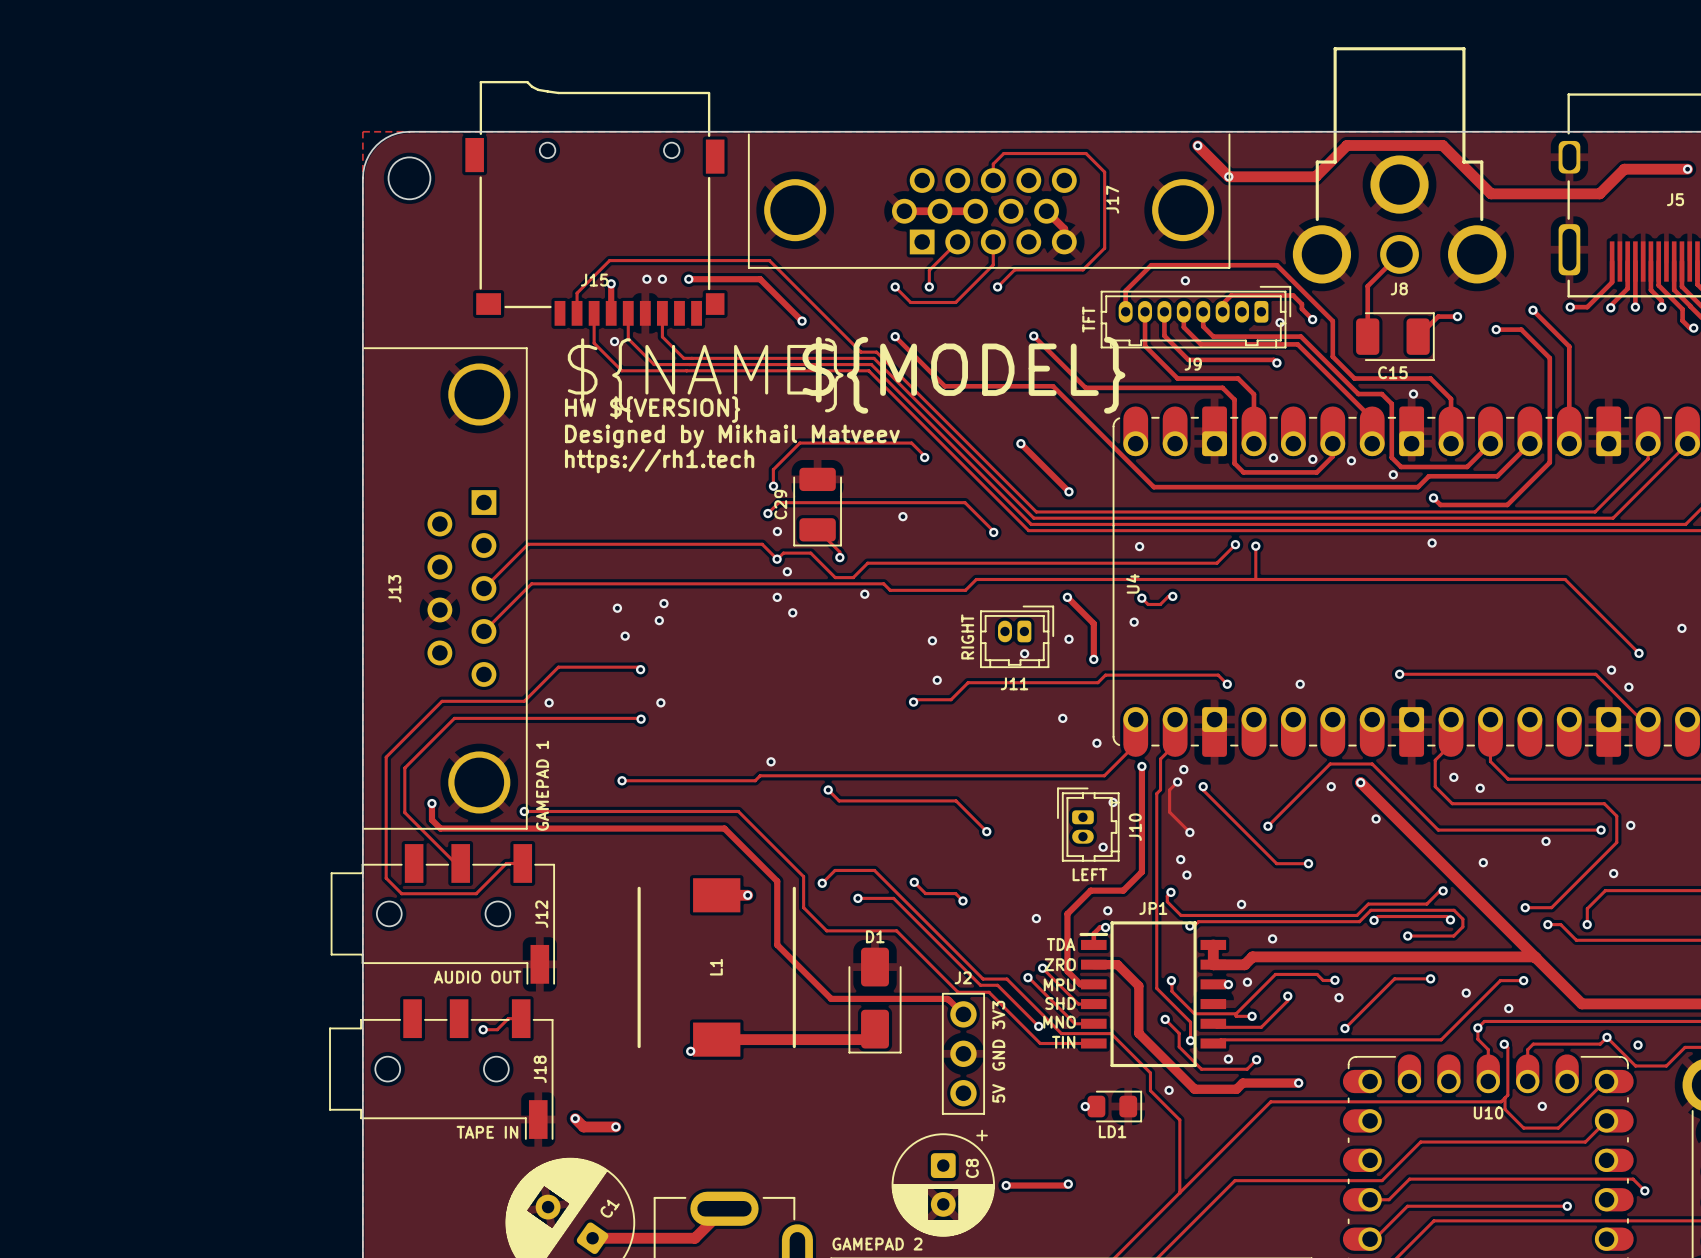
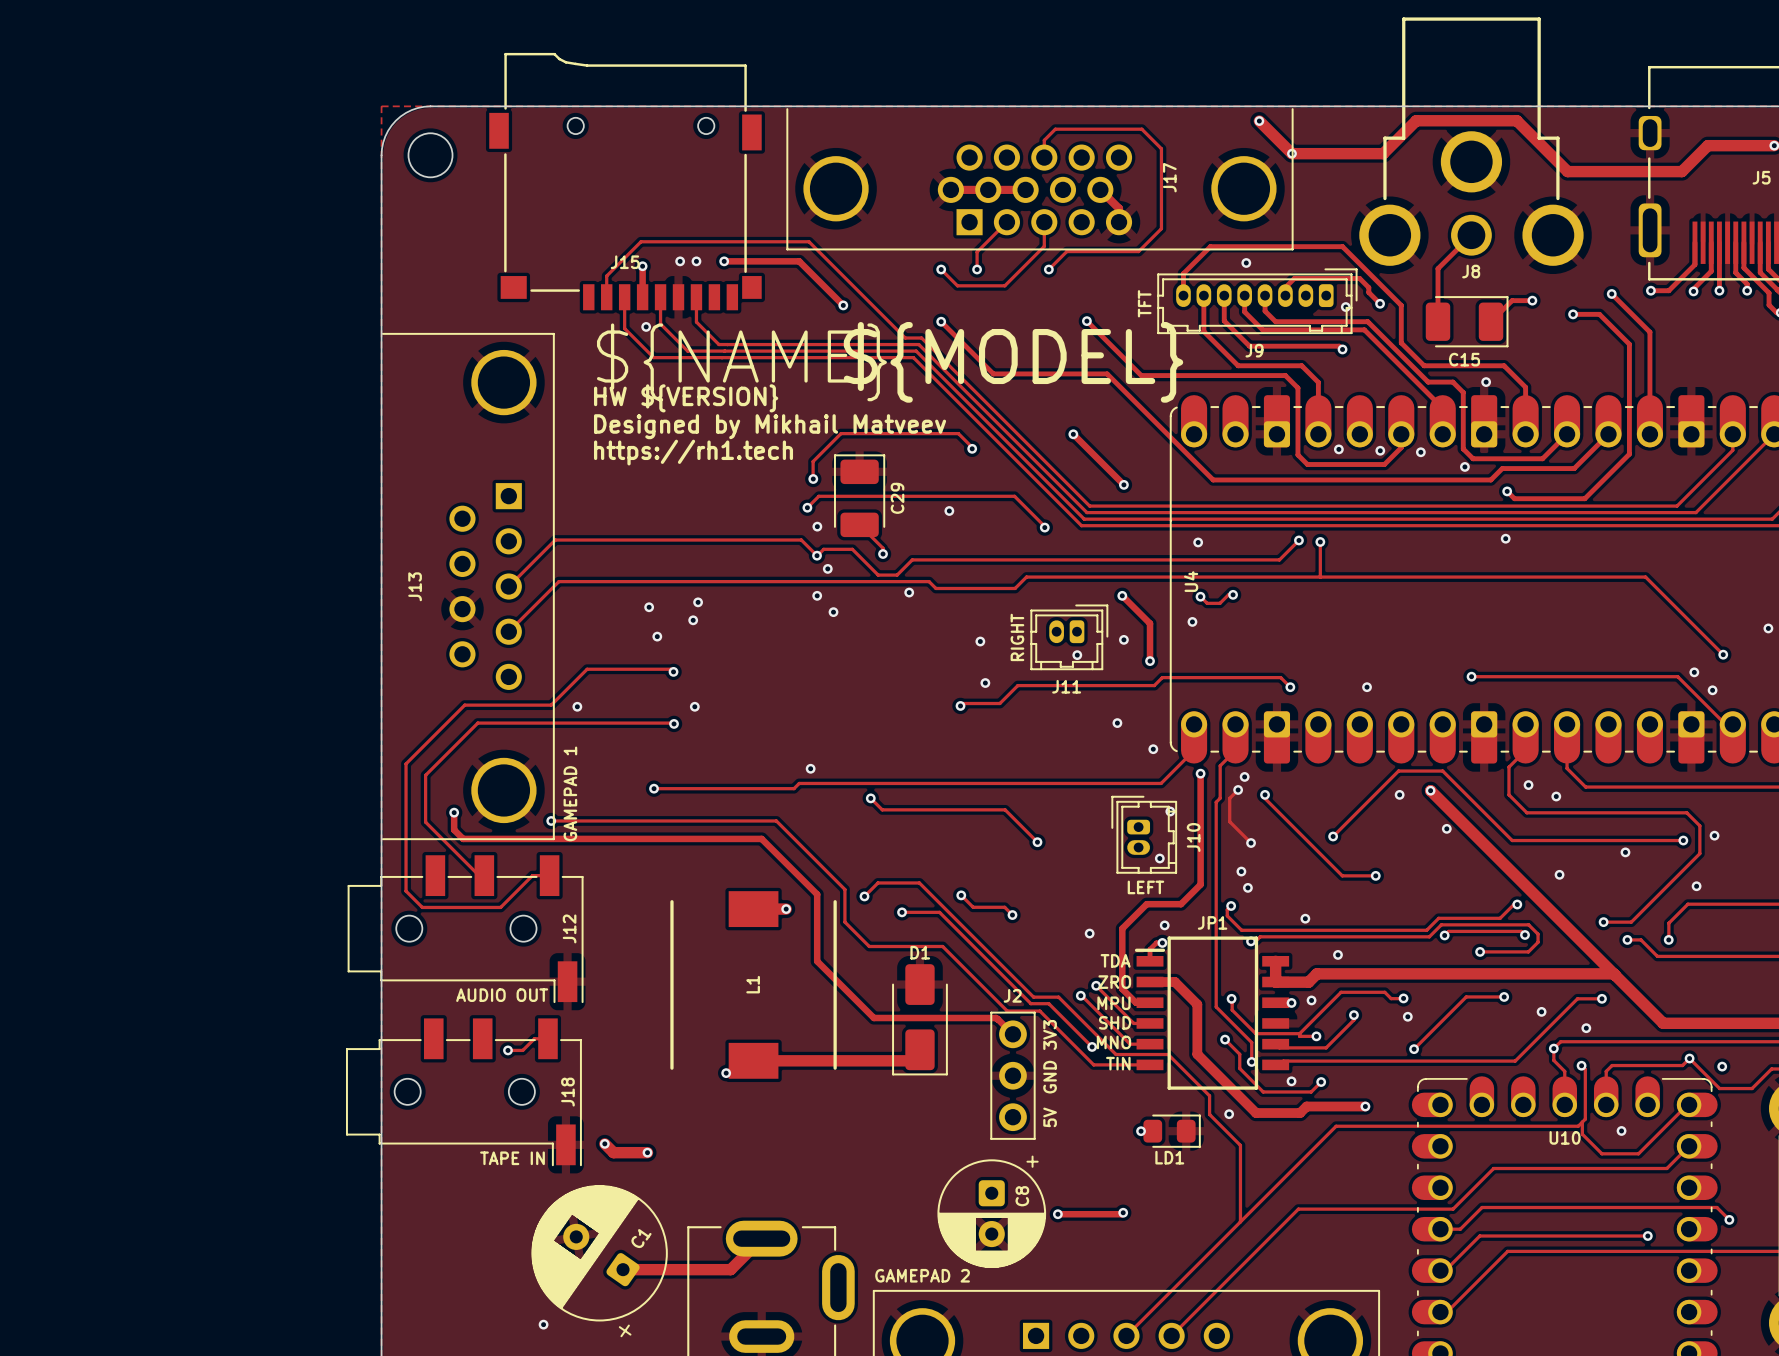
C29 rotation: 0° (817, 507) -> 180° (859, 495)

